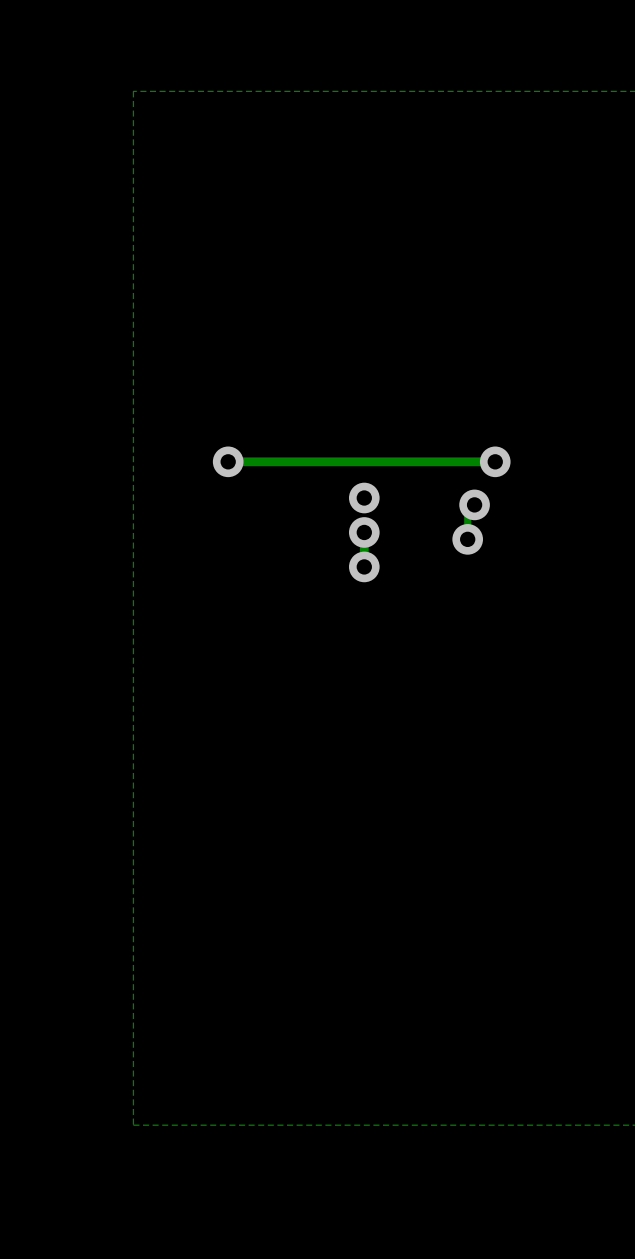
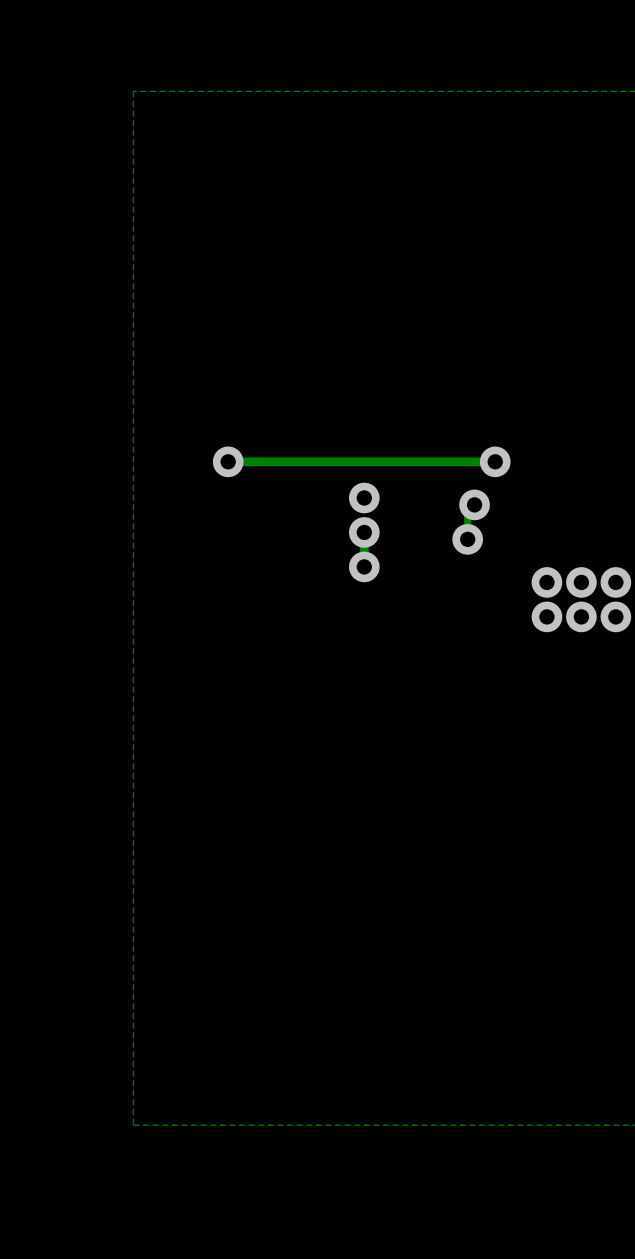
via: none -> (546, 582)
via: none -> (581, 582)
via: none -> (615, 582)
via: none -> (546, 616)
via: none -> (581, 616)
via: none -> (615, 616)

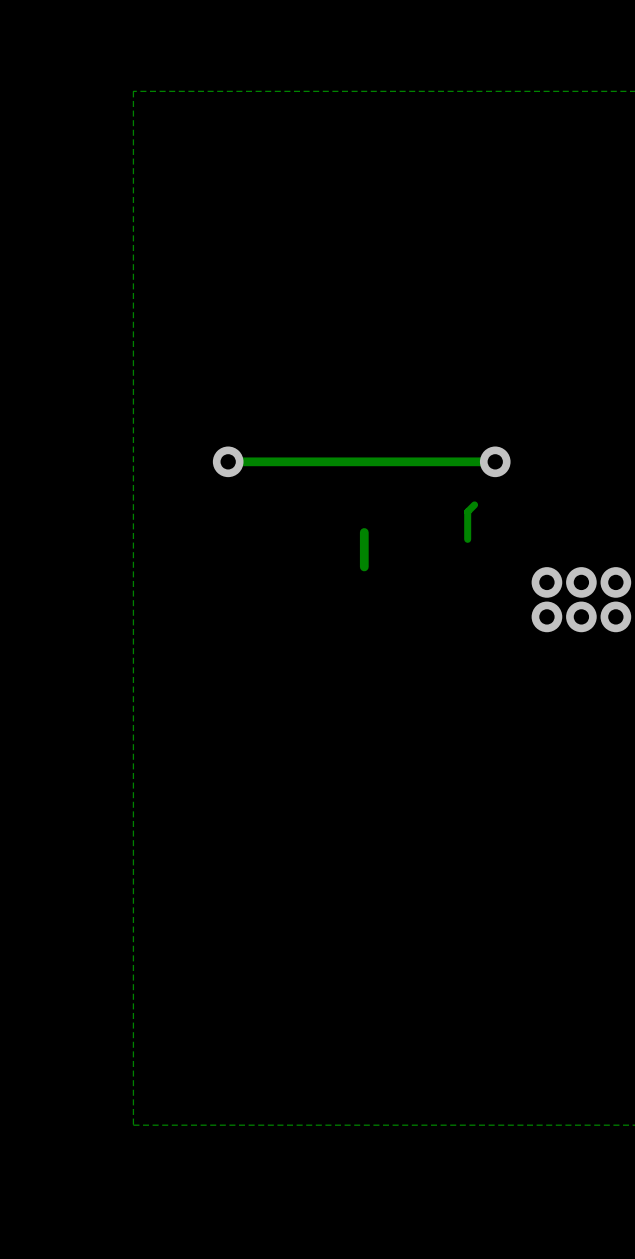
via: (364, 498) -> none
via: (474, 504) -> none
via: (364, 532) -> none
via: (467, 539) -> none
via: (364, 566) -> none

